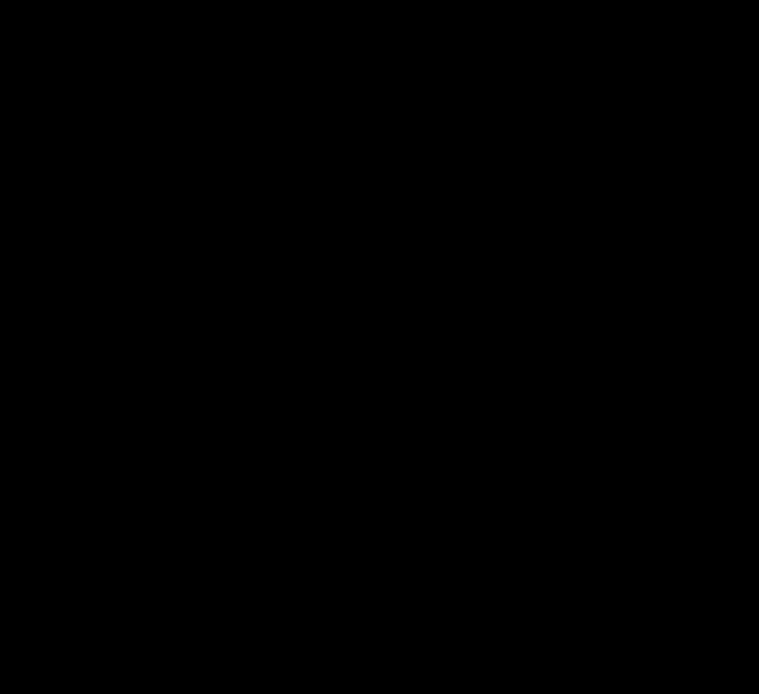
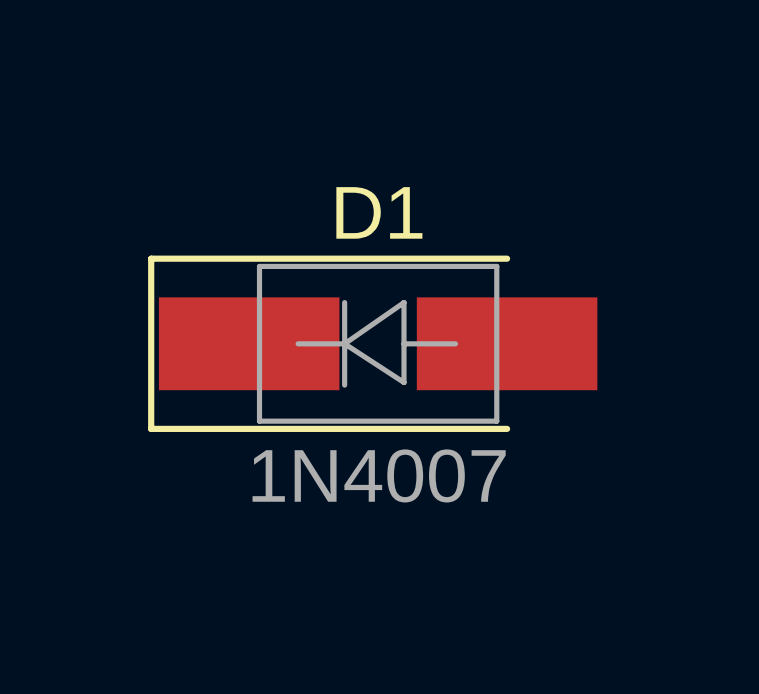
D1: none -> 1N4007 (372, 343)

